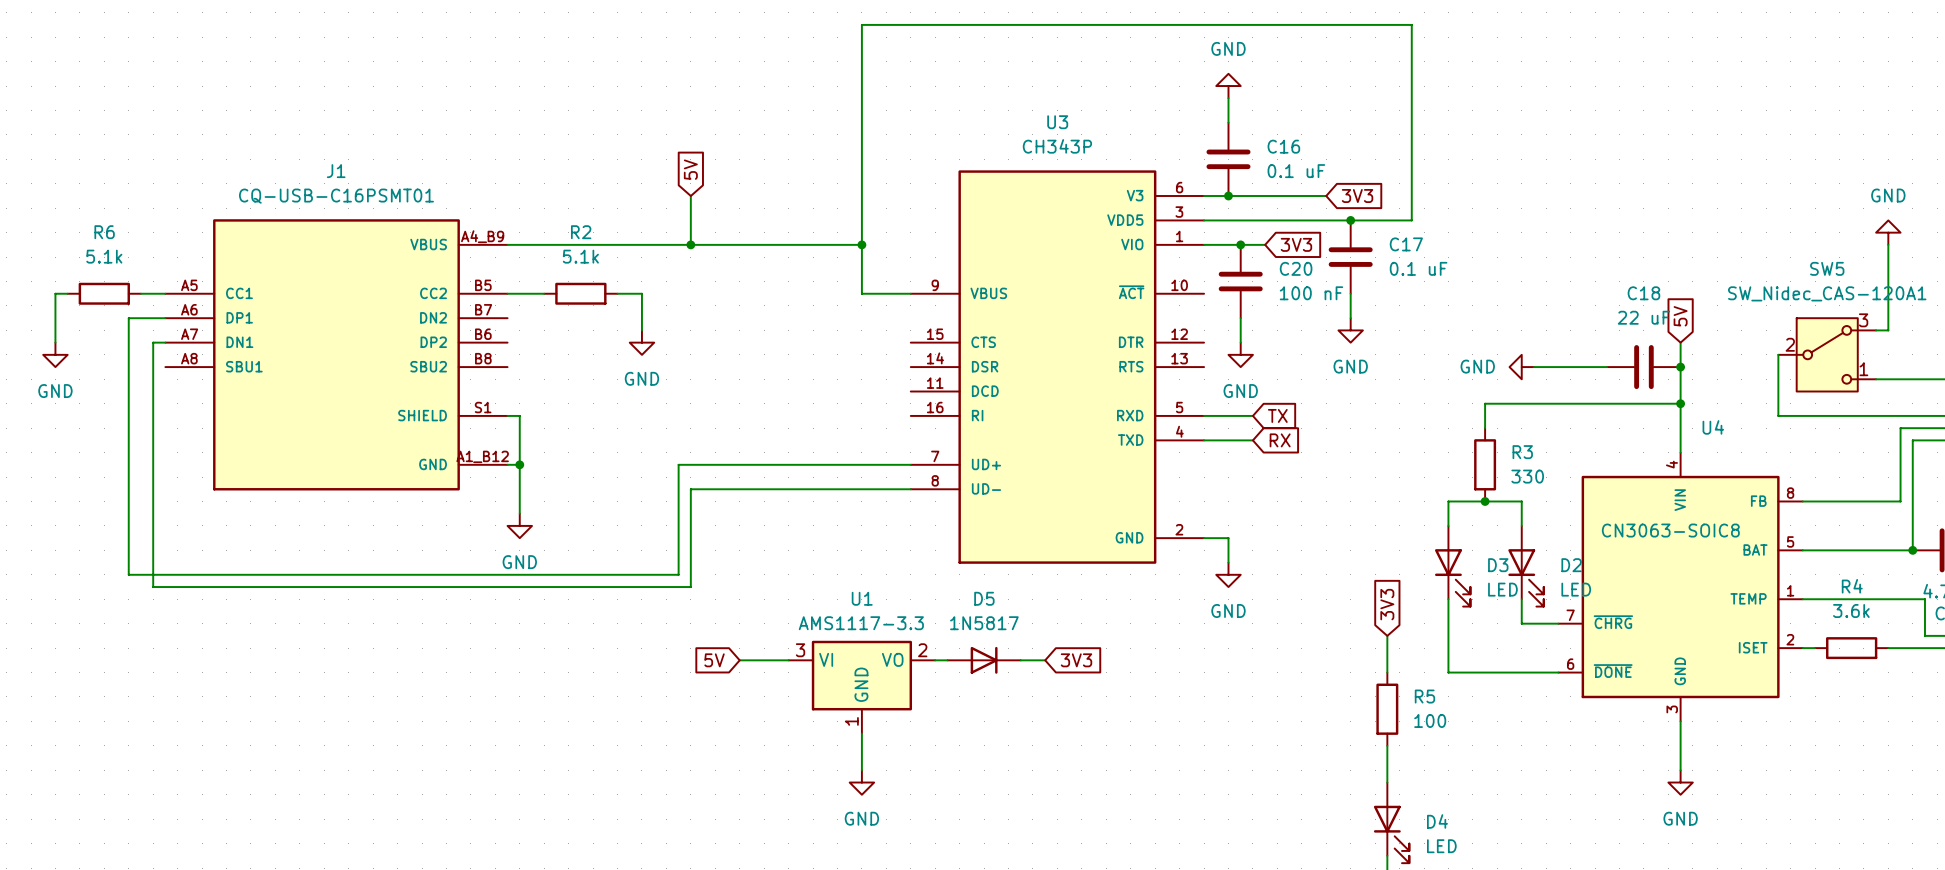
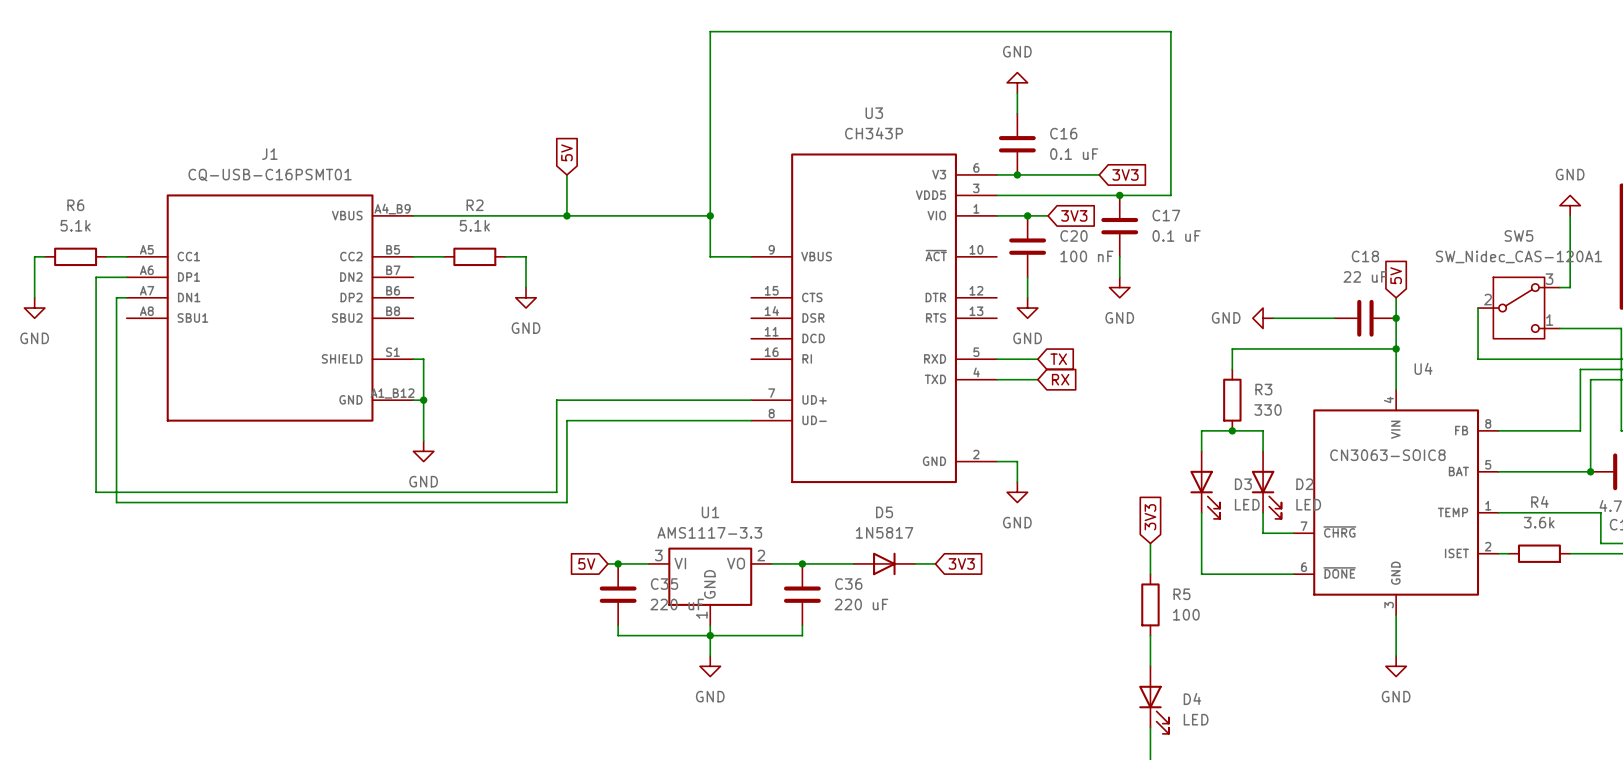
junction: none -> (618, 563)
junction: none -> (802, 563)
D5 position: (984, 660) -> (884, 563)
global label position: 3V3 (1076, 660) -> 3V3 (961, 563)
wire: none -> (915, 563) (935, 563)
C35: none -> 220 uF (618, 594)
C36: none -> 220 uF (802, 594)
wire: none -> (618, 625) (618, 635) (802, 635) (802, 625)
junction: none -> (710, 635)

